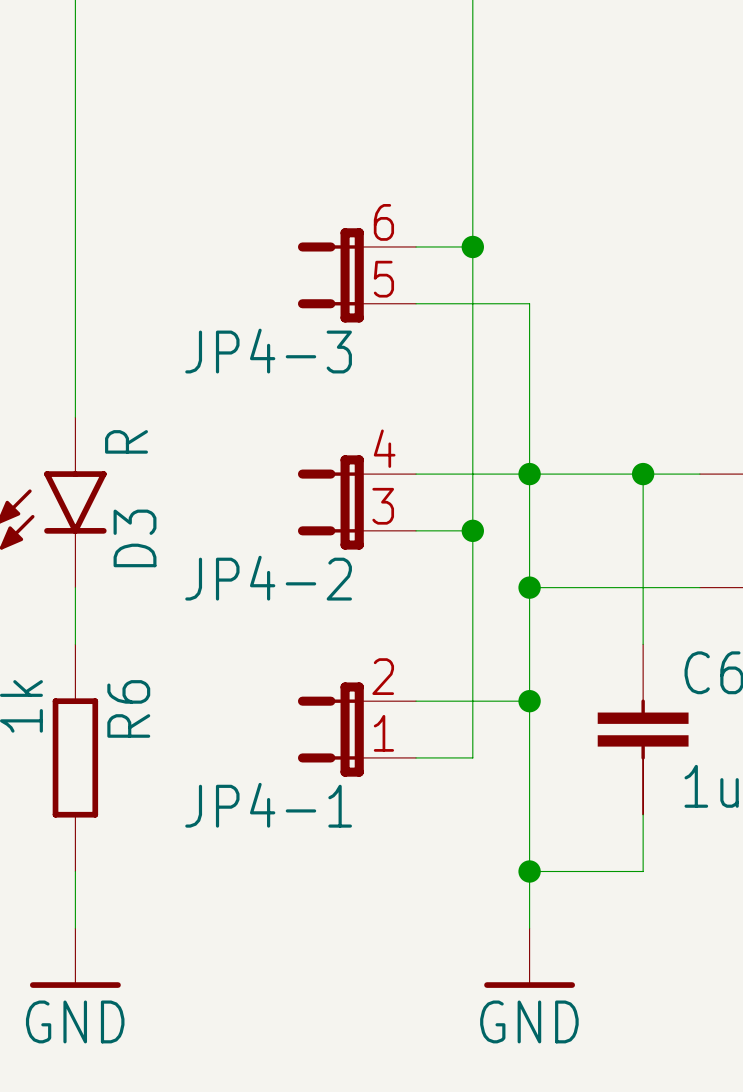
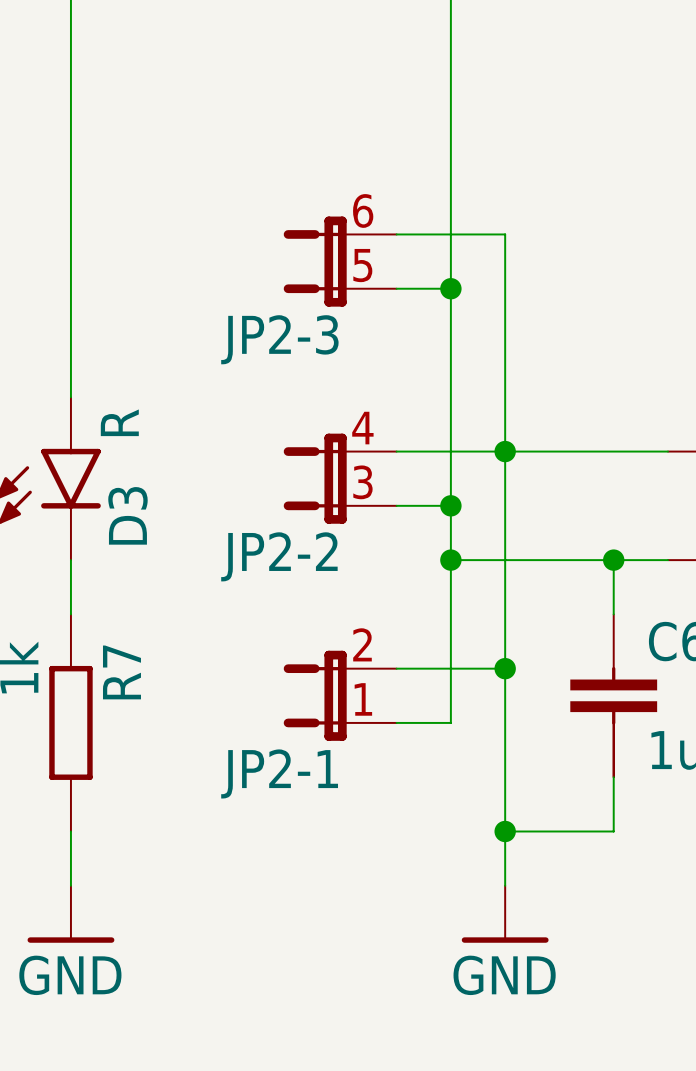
junction position: (472, 246) -> (450, 288)
wire: (472, 303) (529, 303) -> (450, 234) (505, 234) (505, 288)
JP4-3 name: JP4-3 (268, 351) -> JP2-3 (279, 339)
wire: (643, 474) (643, 587) -> none
junction: (643, 474) -> none
JP4-2 name: JP4-2 (268, 578) -> JP2-2 (279, 556)
wire: none -> (450, 560) (505, 560)
junction: none -> (450, 560)
junction: (529, 587) -> none
junction: none -> (613, 560)
R6 name: R6 (128, 708) -> R7 (121, 672)
JP4-1 name: JP4-1 (268, 805) -> JP2-1 (279, 773)

